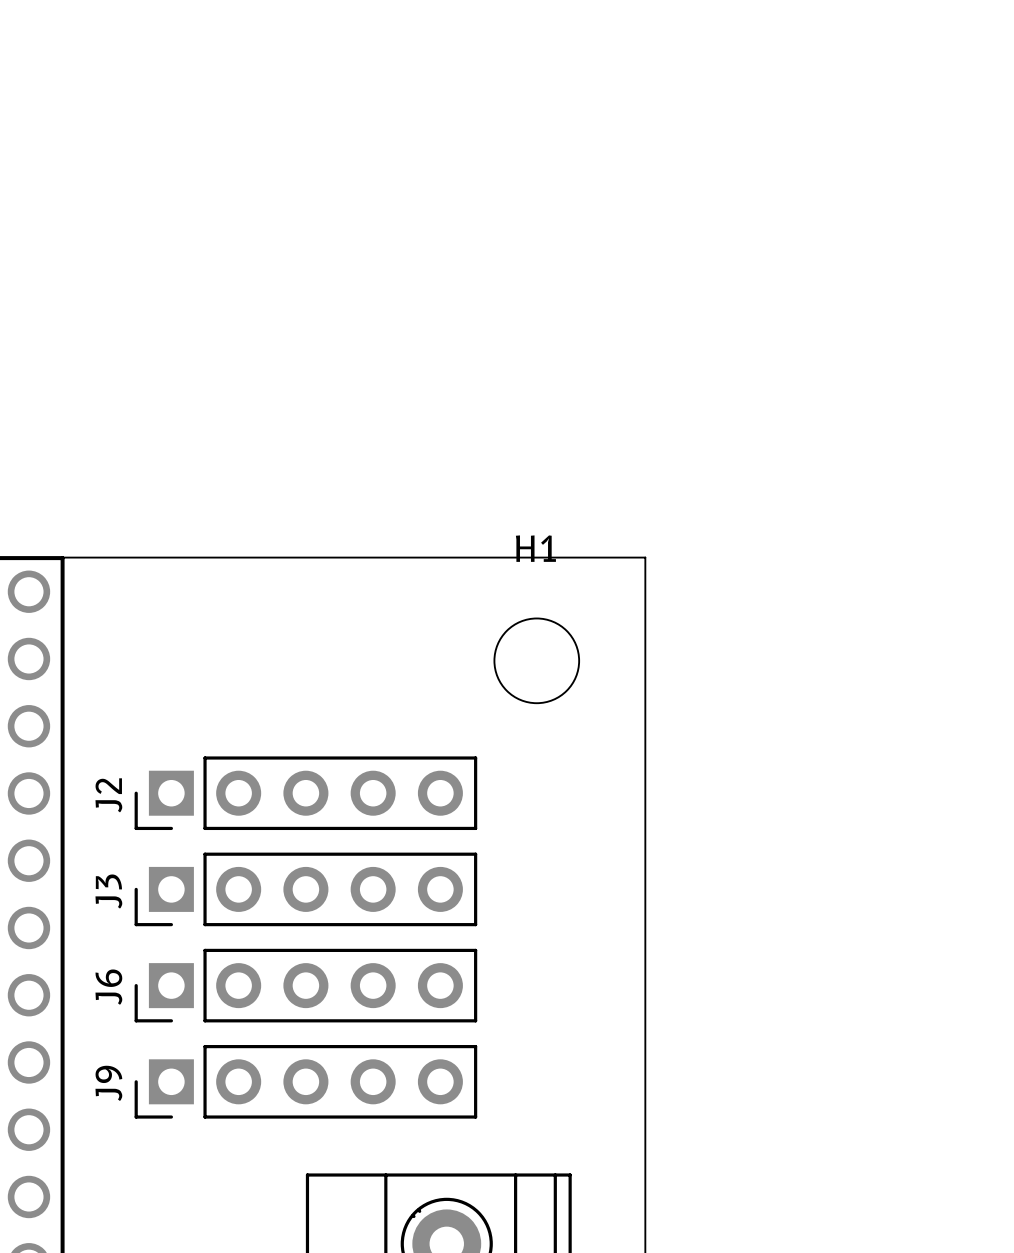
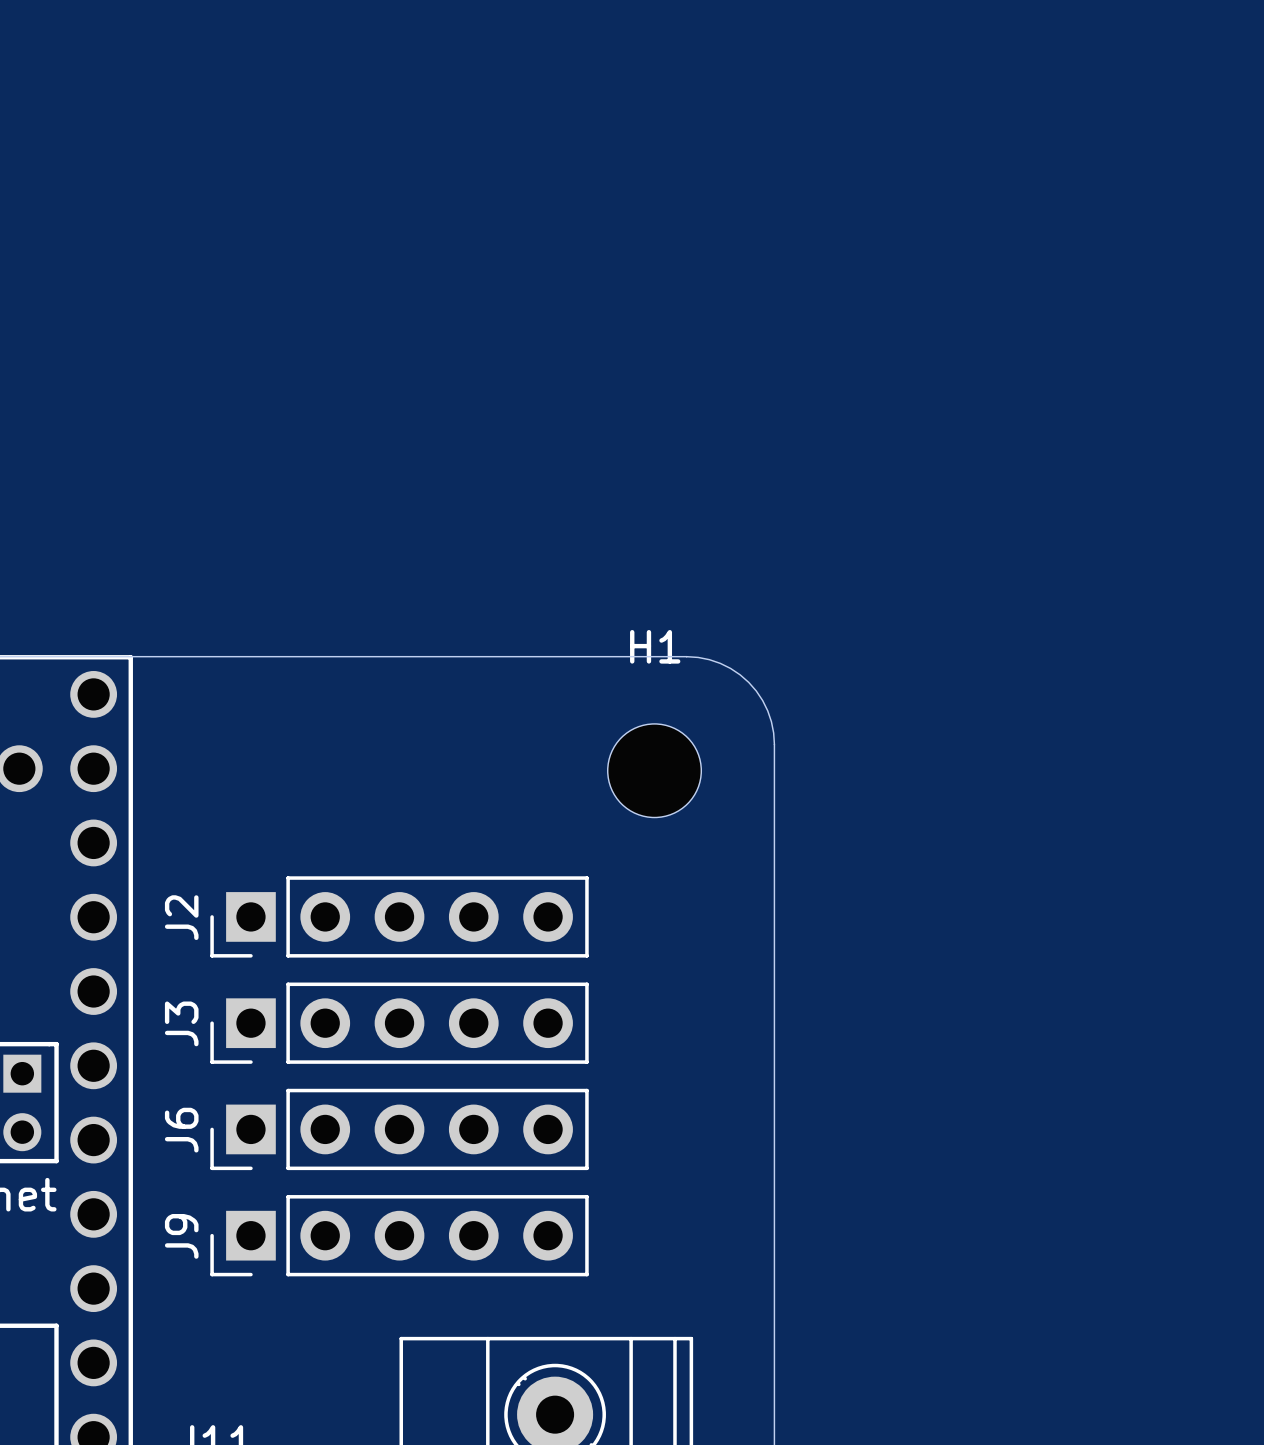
board edge: (565, 557) (645, 557) (645, 637) -> (686, 656) (720, 663) (748, 682) (767, 710) (774, 744)

